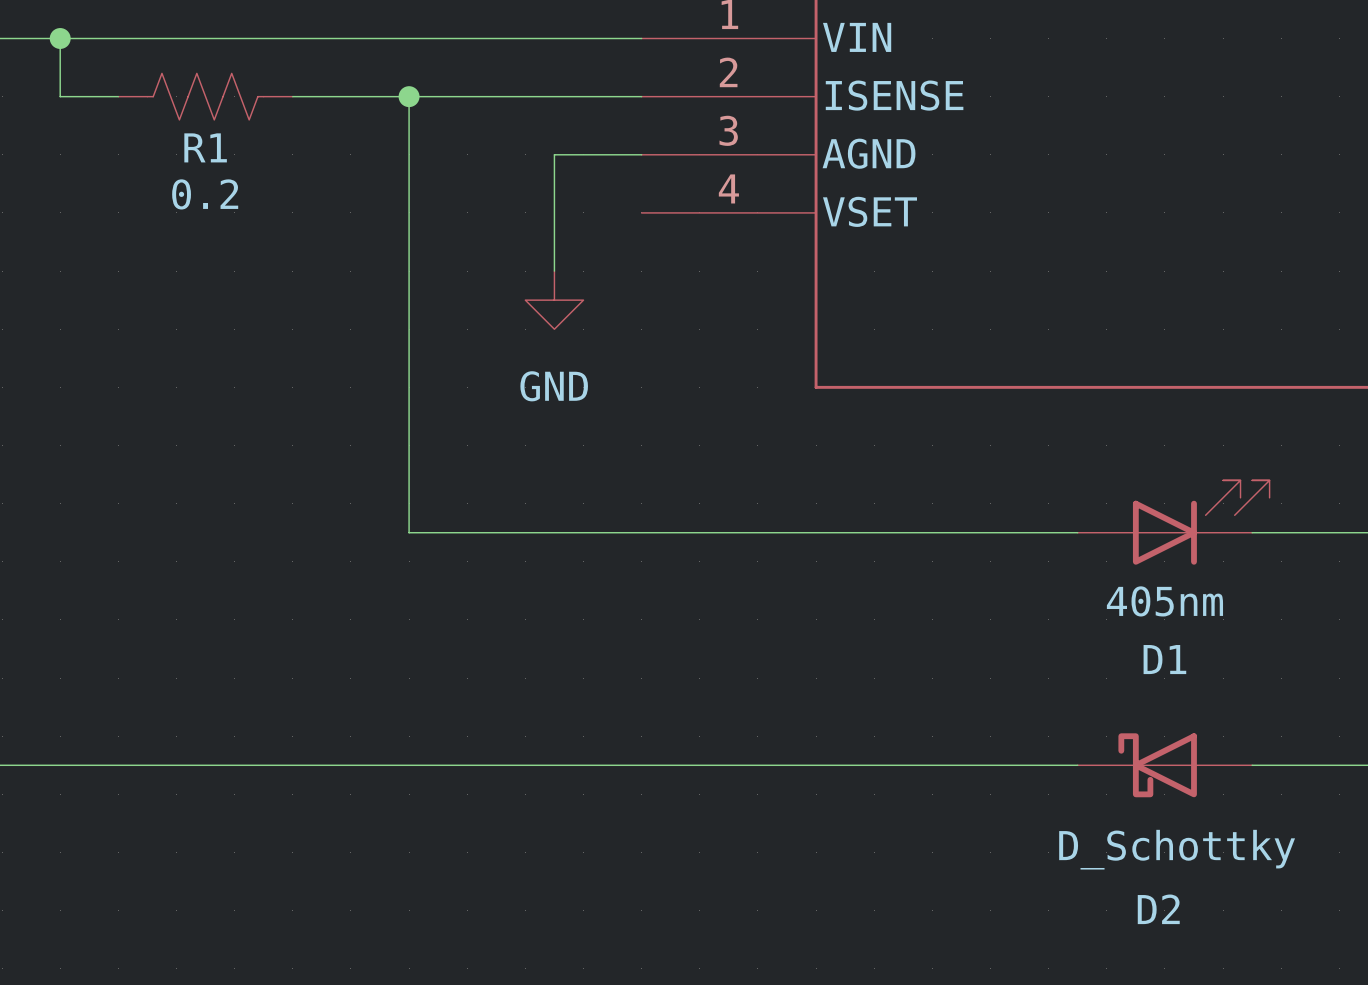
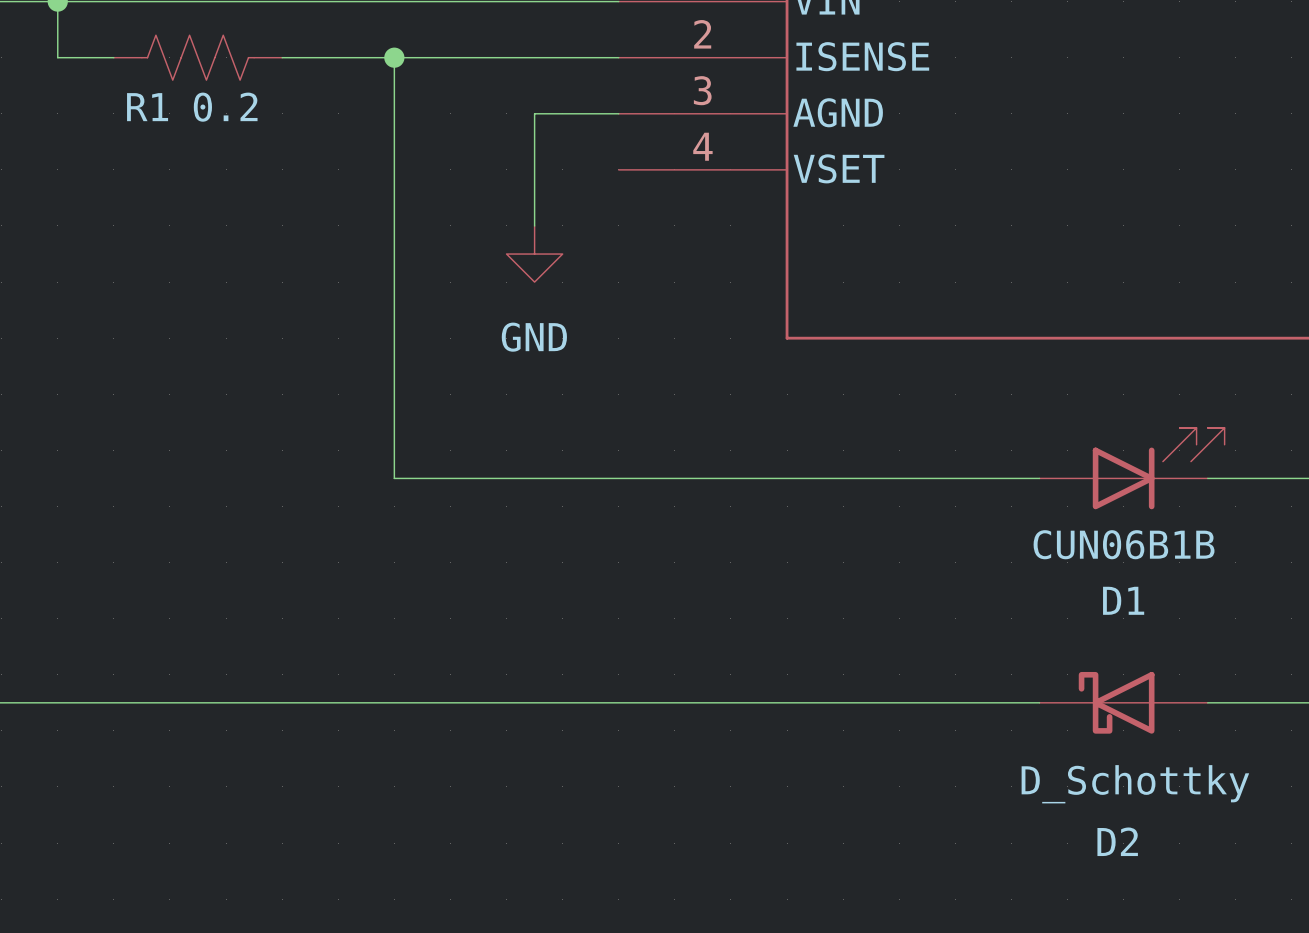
R1 name position: R1 (205, 147) -> R1 (147, 107)
R1 value position: 0.2 (205, 194) -> 0.2 (225, 107)
D1 value: 405nm (1164, 601) -> CUN06B1B (1124, 544)

